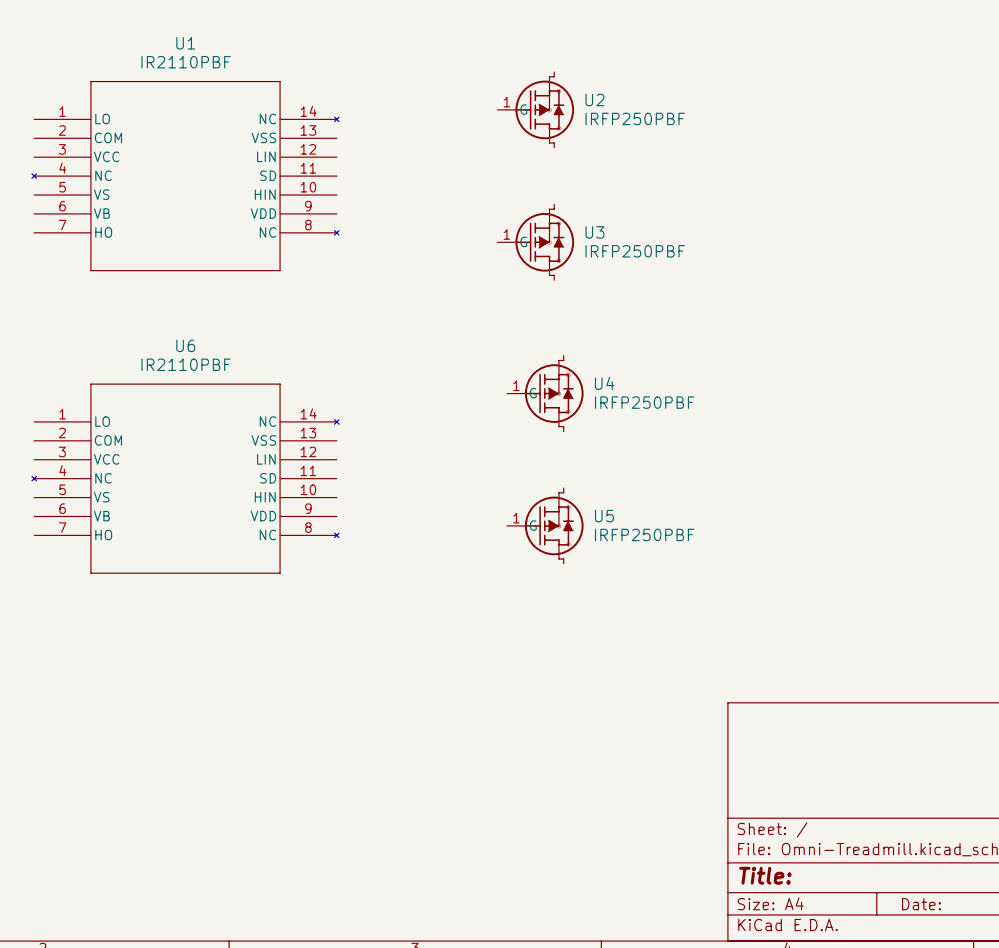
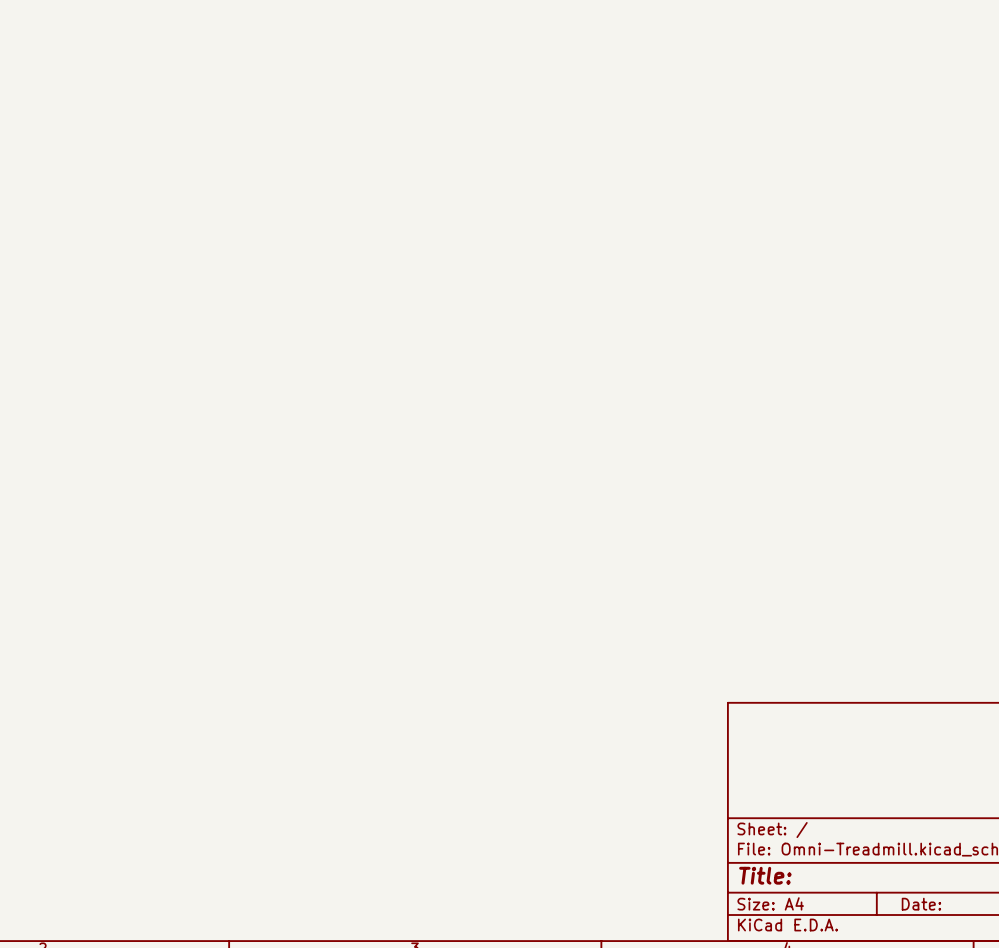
U2: IRFP250PBF (535, 109) -> none
U1: IR2110PBF (185, 176) -> none
U3: IRFP250PBF (535, 242) -> none
U4: IRFP250PBF (545, 393) -> none
U6: IR2110PBF (185, 478) -> none
U5: IRFP250PBF (545, 525) -> none

